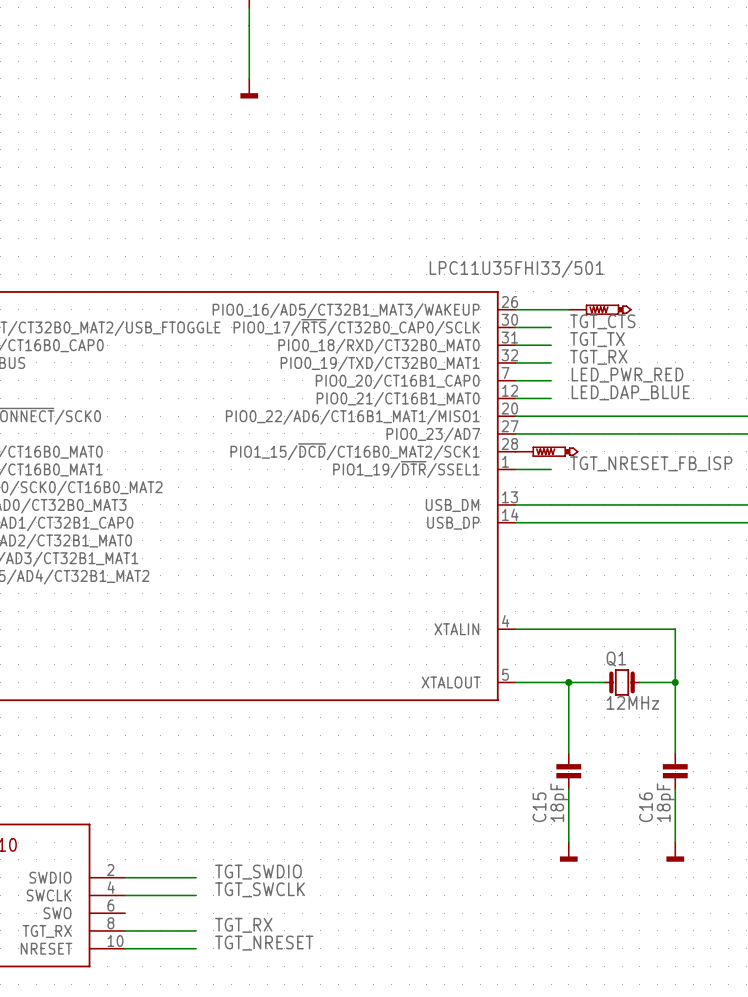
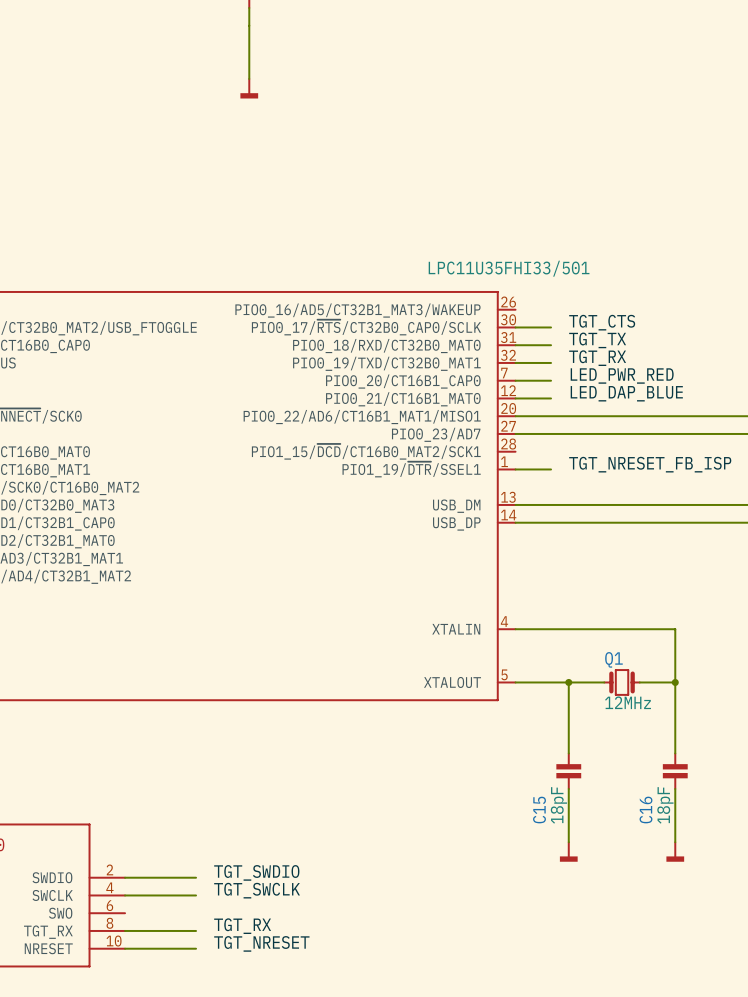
wire: (515, 309) (568, 309) -> none
part: (600, 309) -> none
part: (546, 451) -> none

